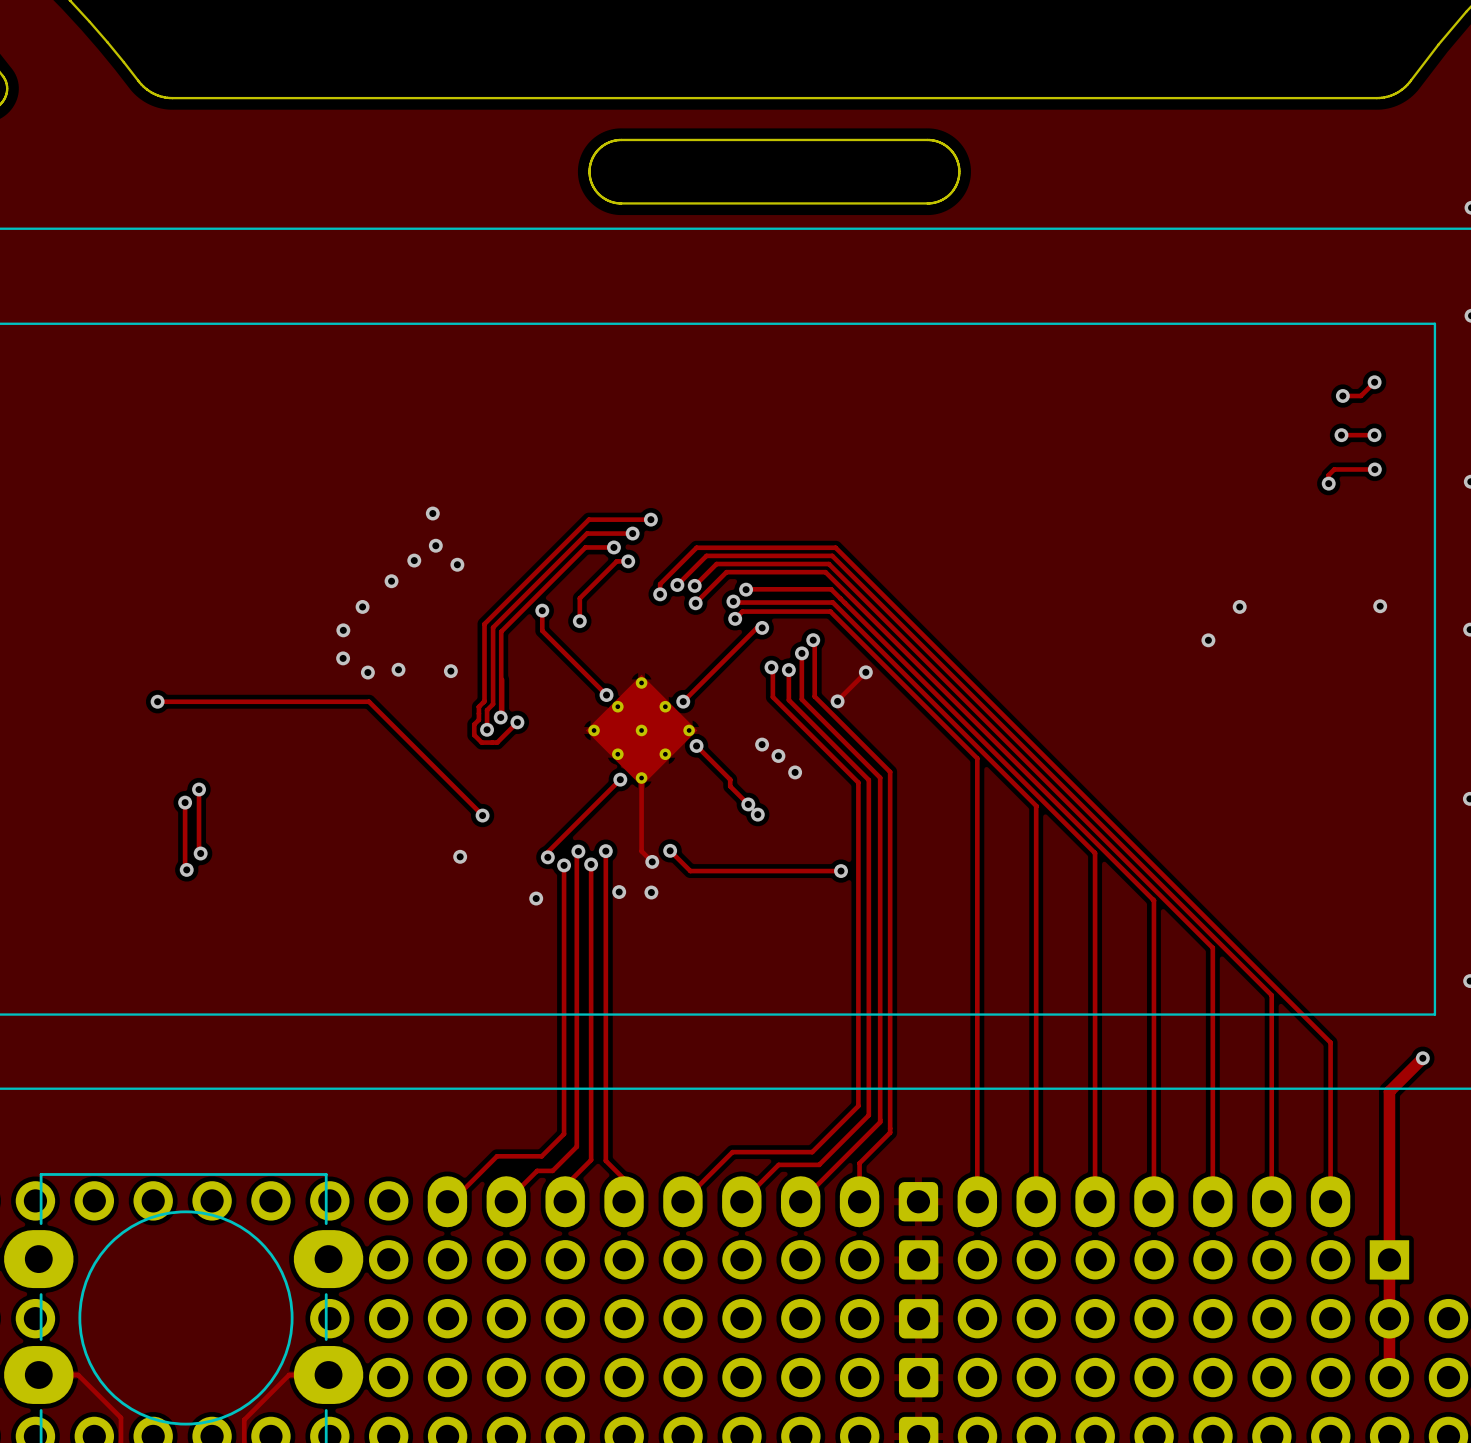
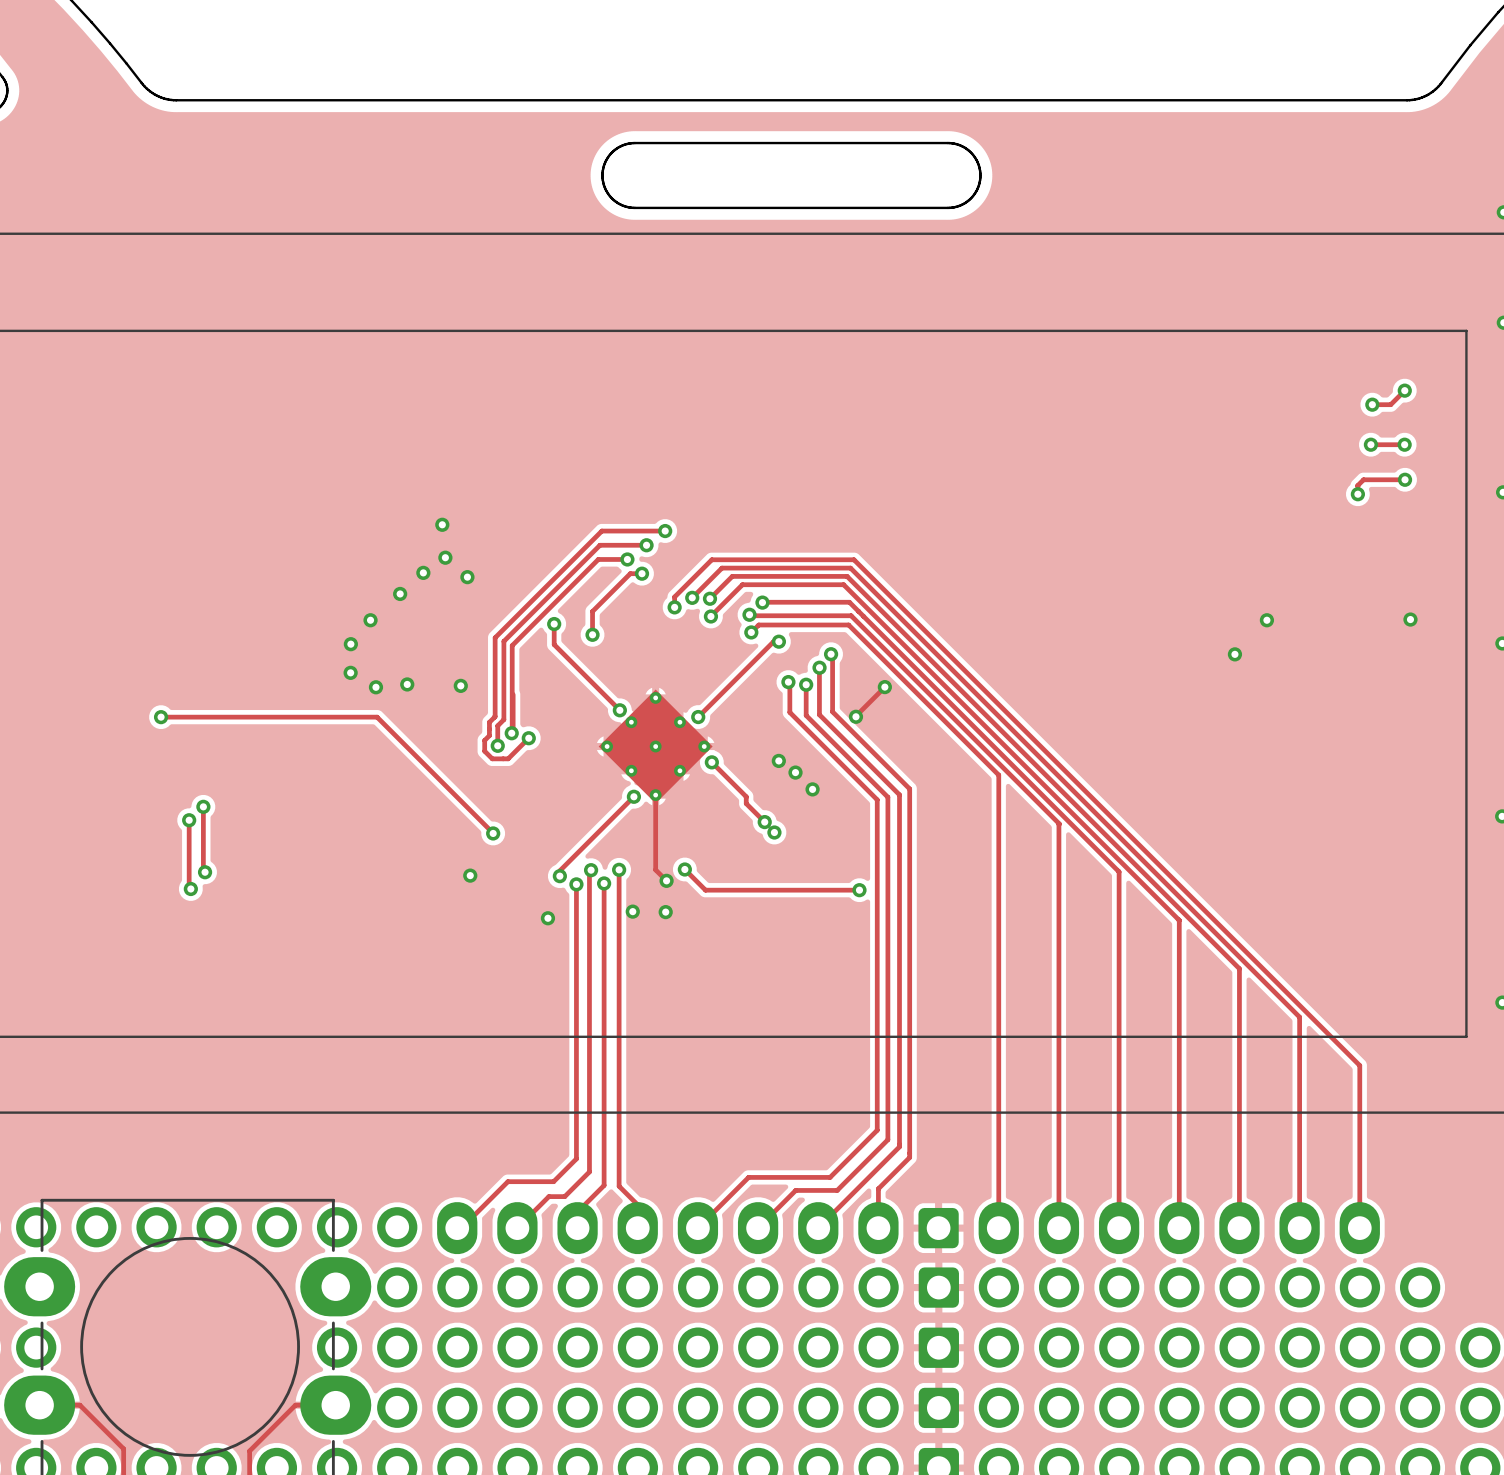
track: (1422, 1058) (1389, 1091) (1389, 1377) -> none
via: (1422, 1058) -> none
part footprint: [1369, 1240, 1410, 1398] -> [1399, 1327, 1441, 1368]
part: none -> (1420, 1287)
part: none -> (1420, 1407)

